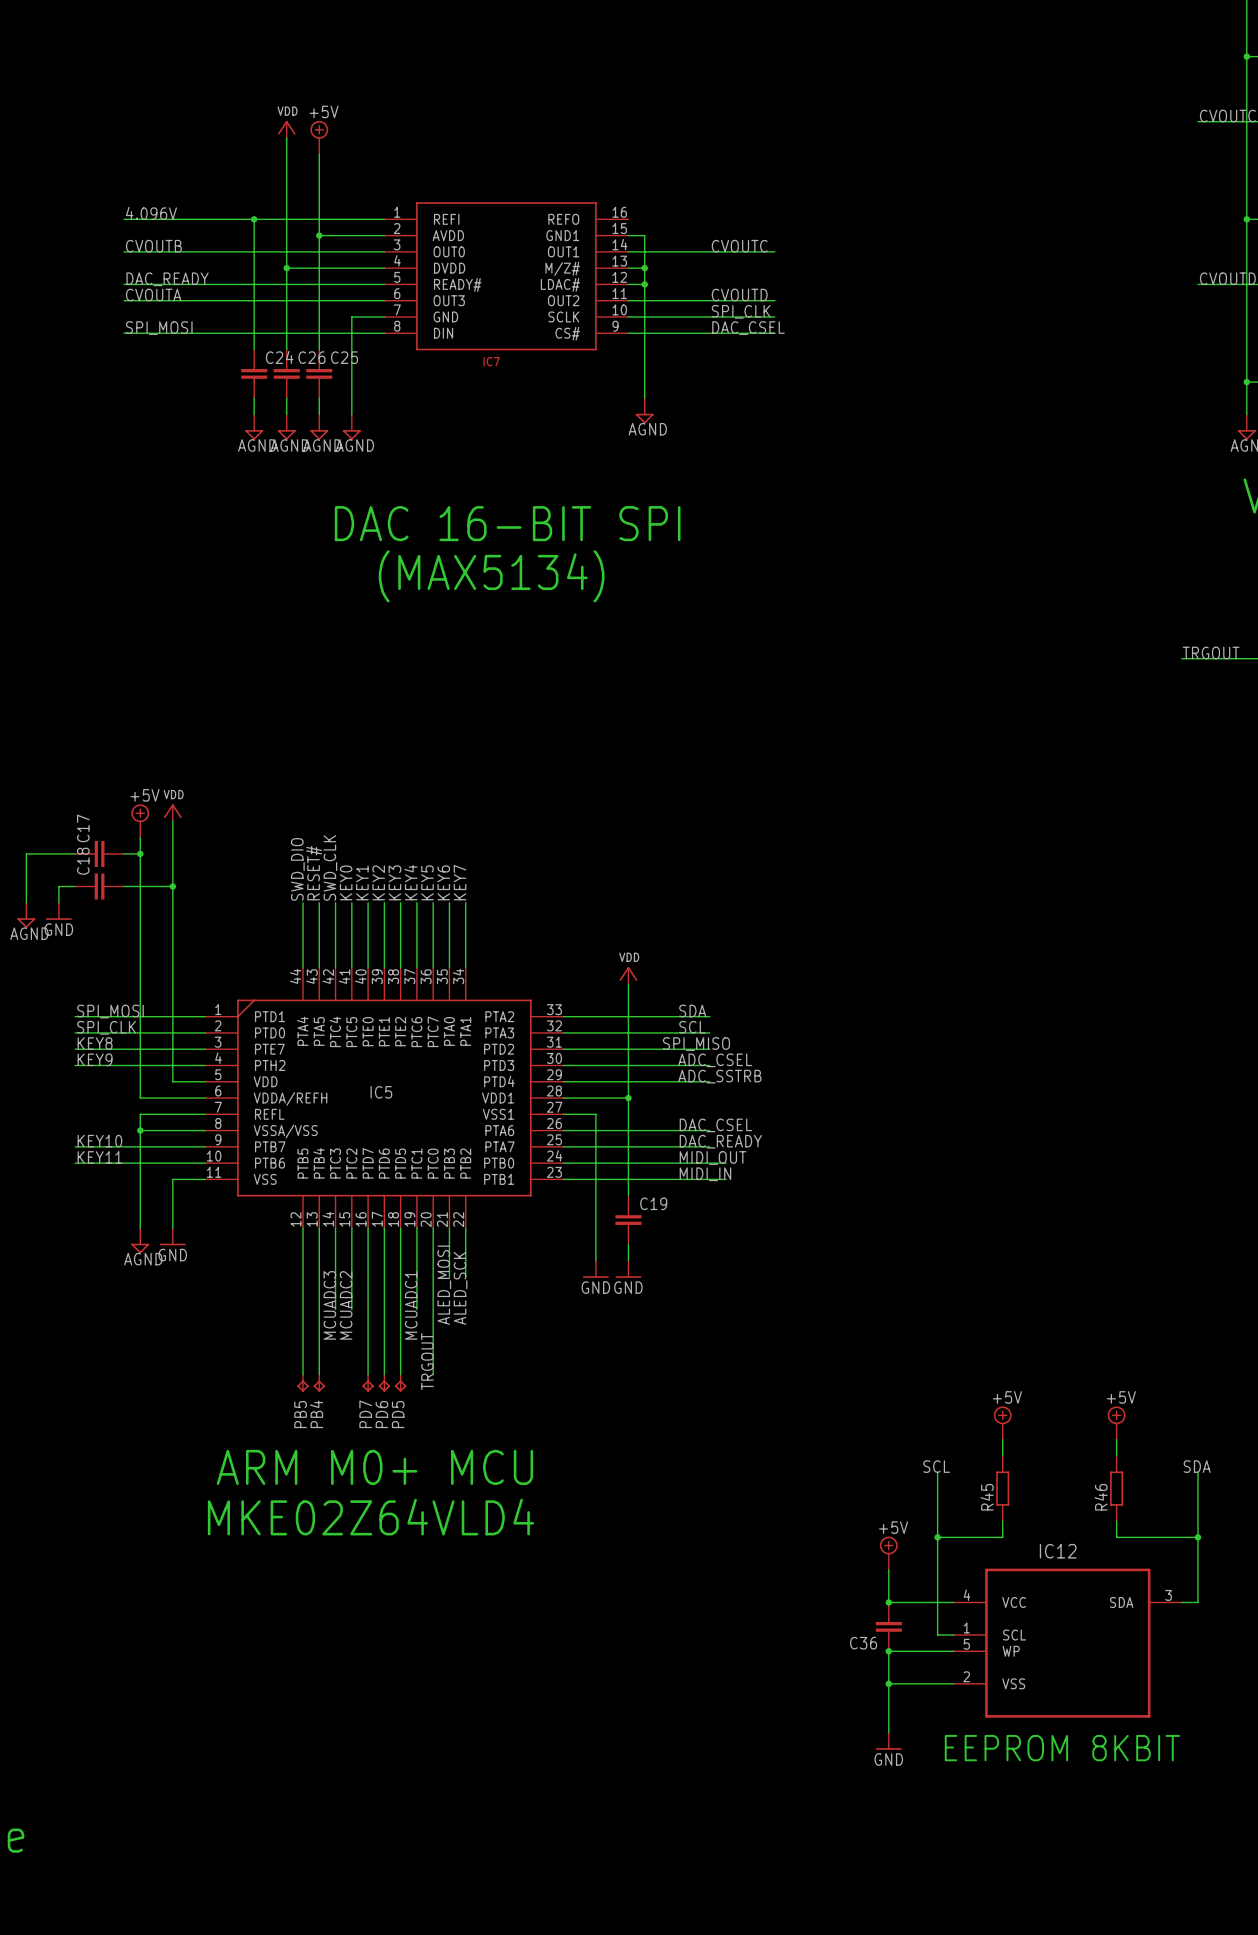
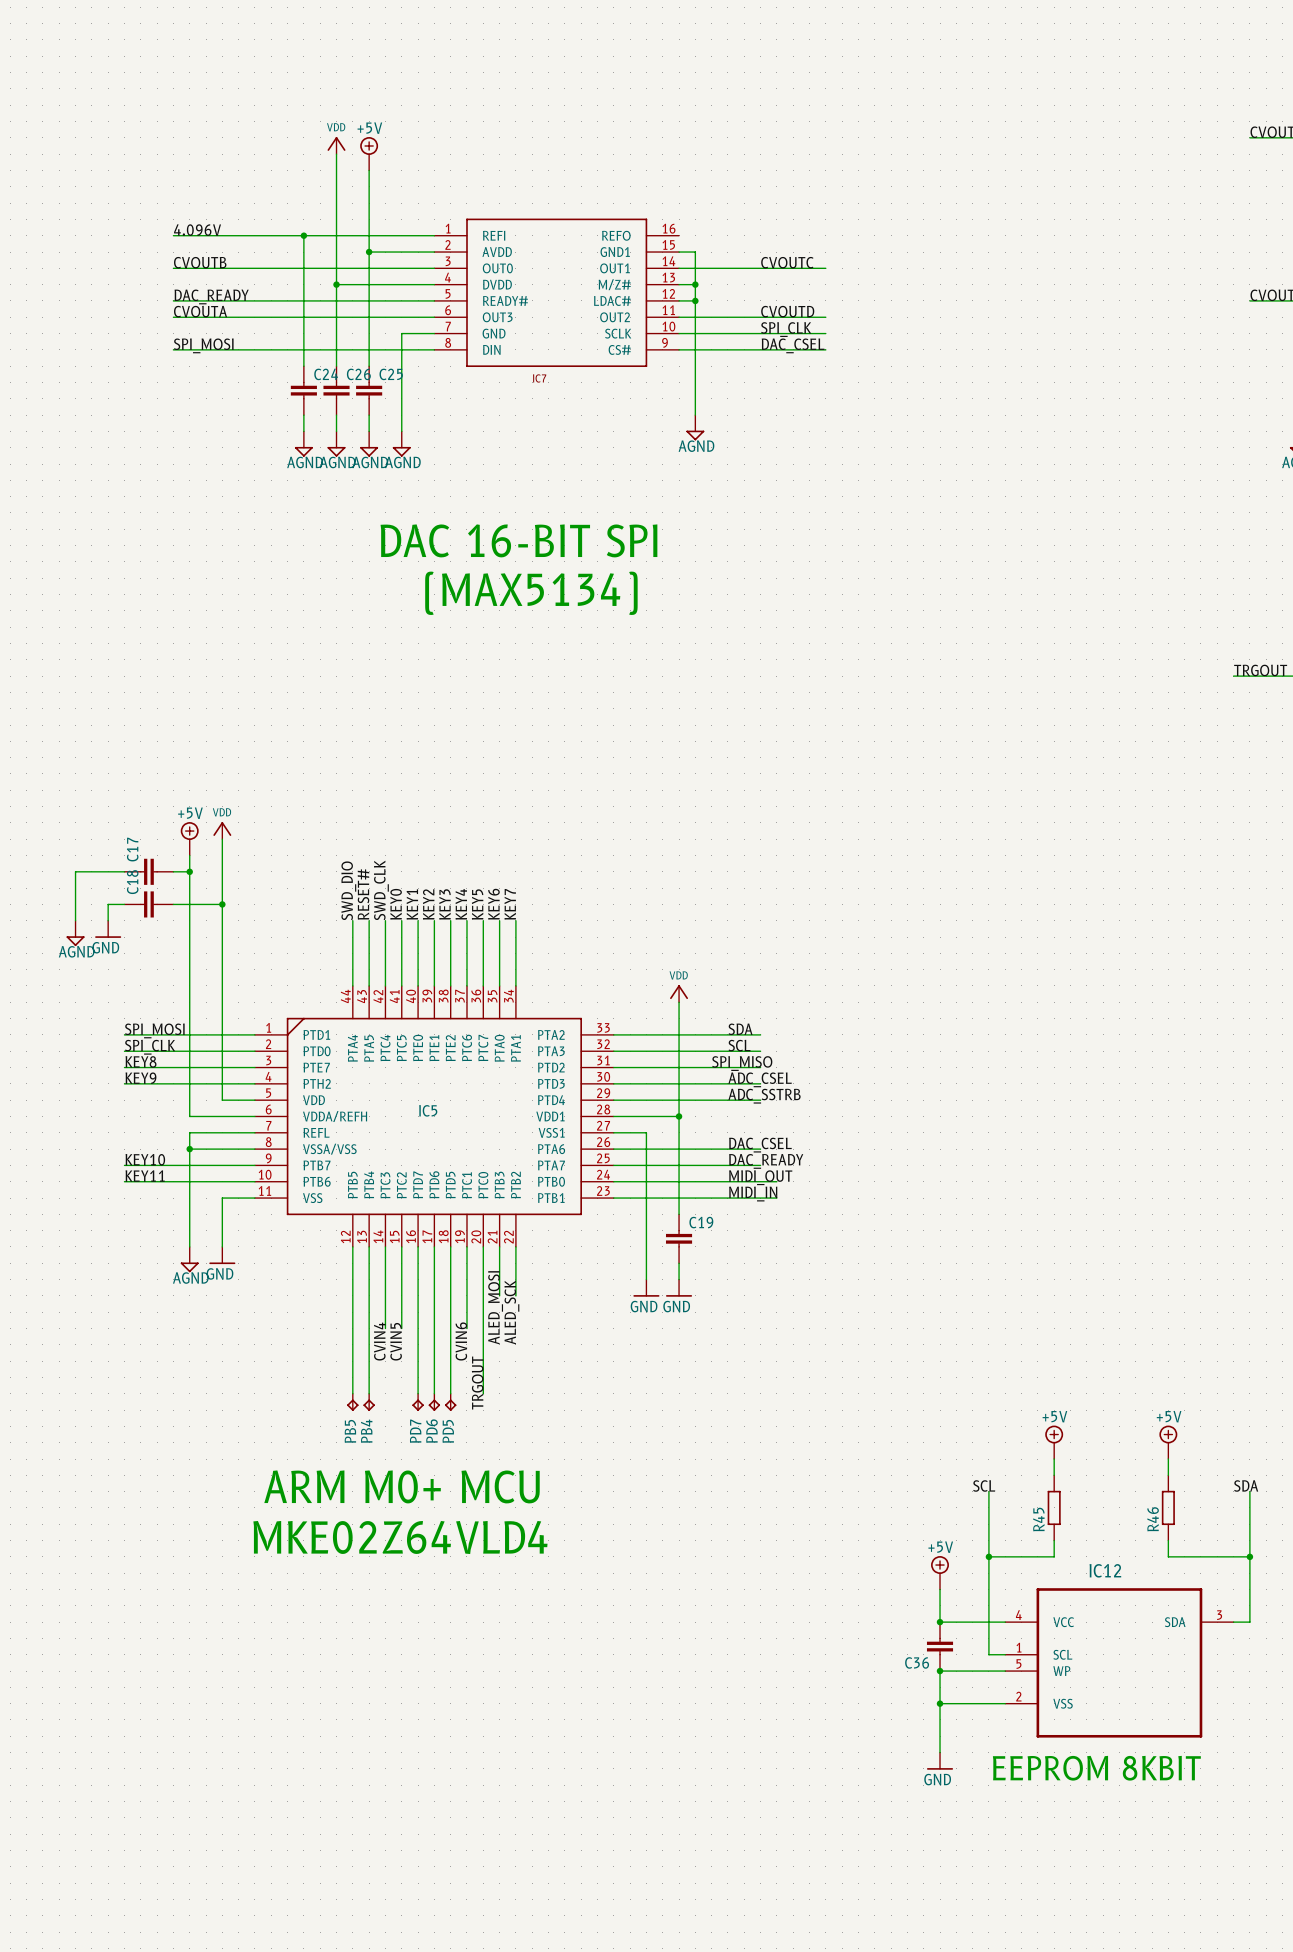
label: MCUADC3 (329, 1305) -> CVIN4 (379, 1341)
label: MCUADC2 (346, 1305) -> CVIN5 (396, 1341)
label: MCUADC1 (411, 1305) -> CVIN6 (461, 1341)

